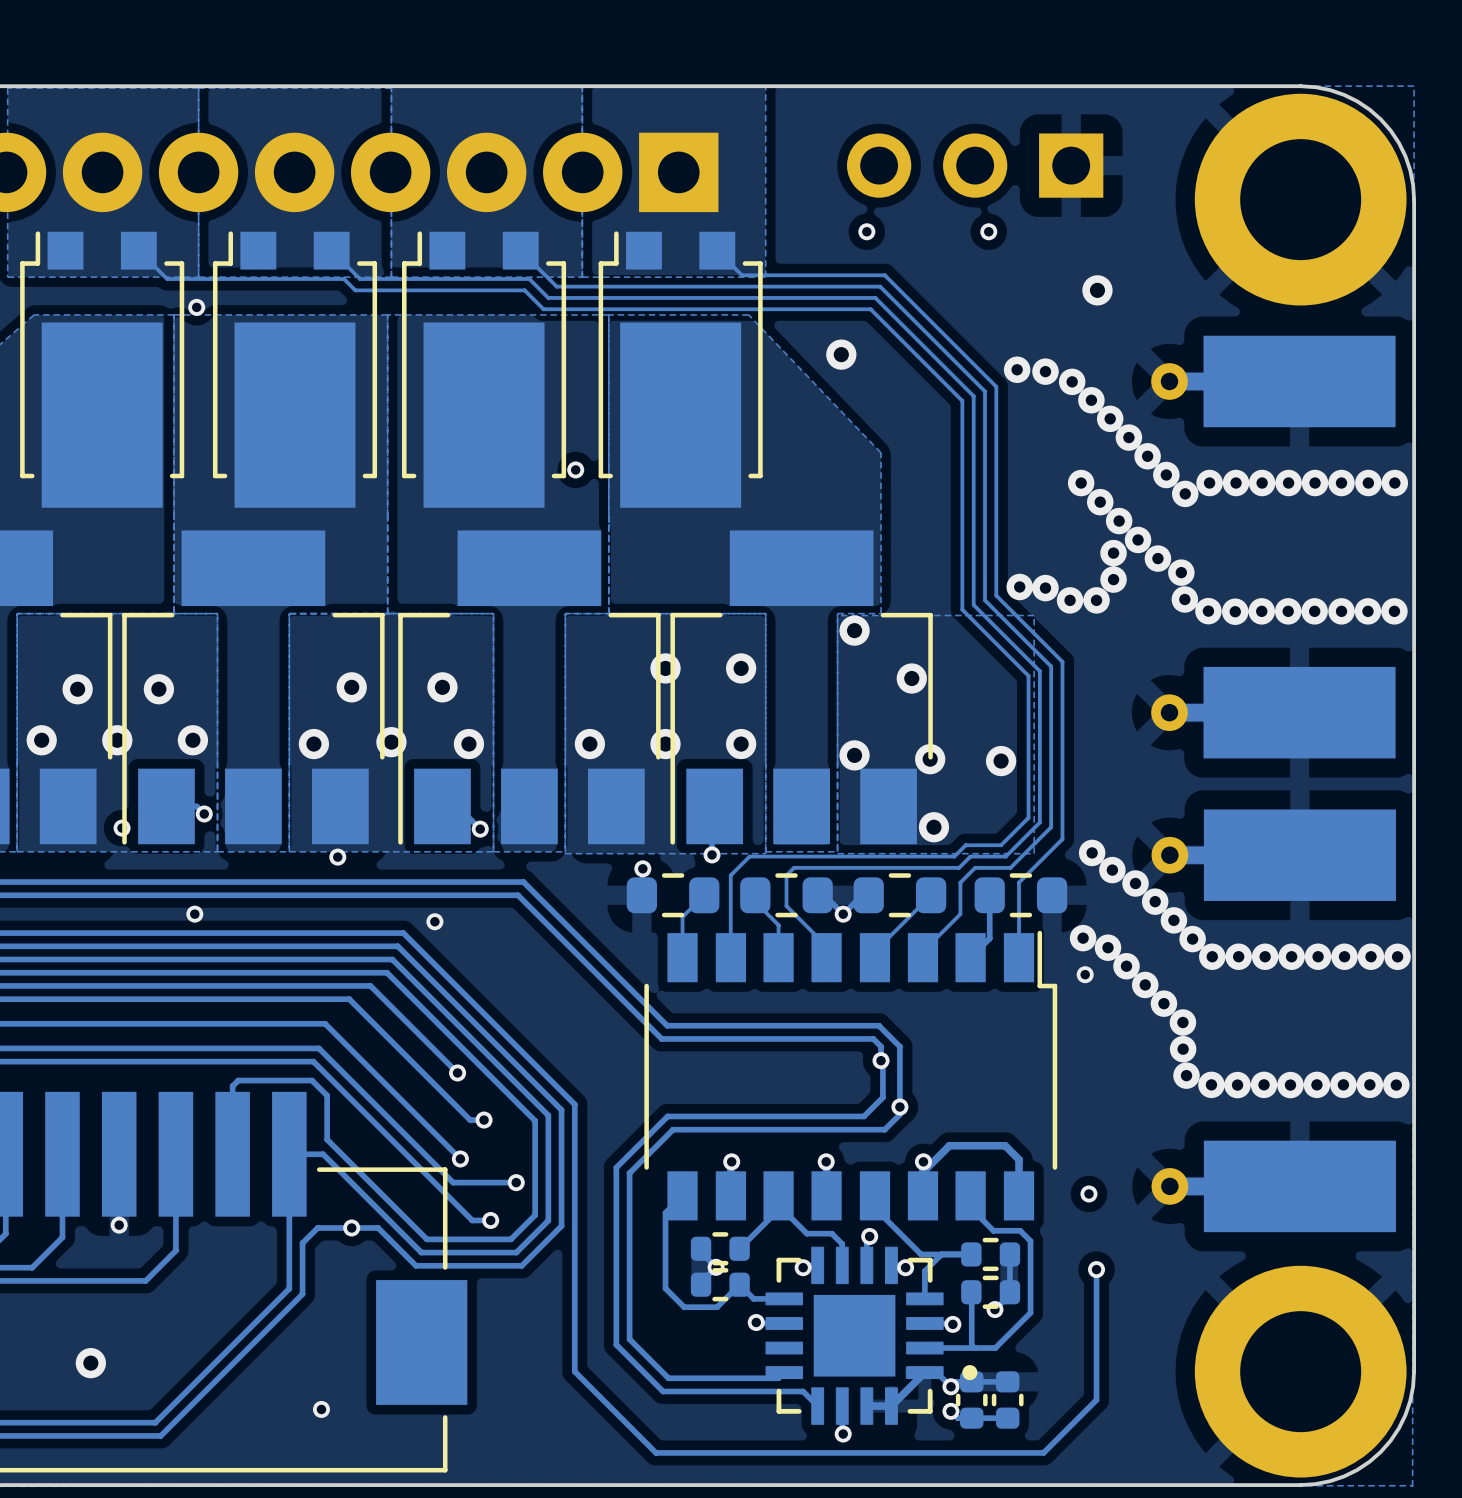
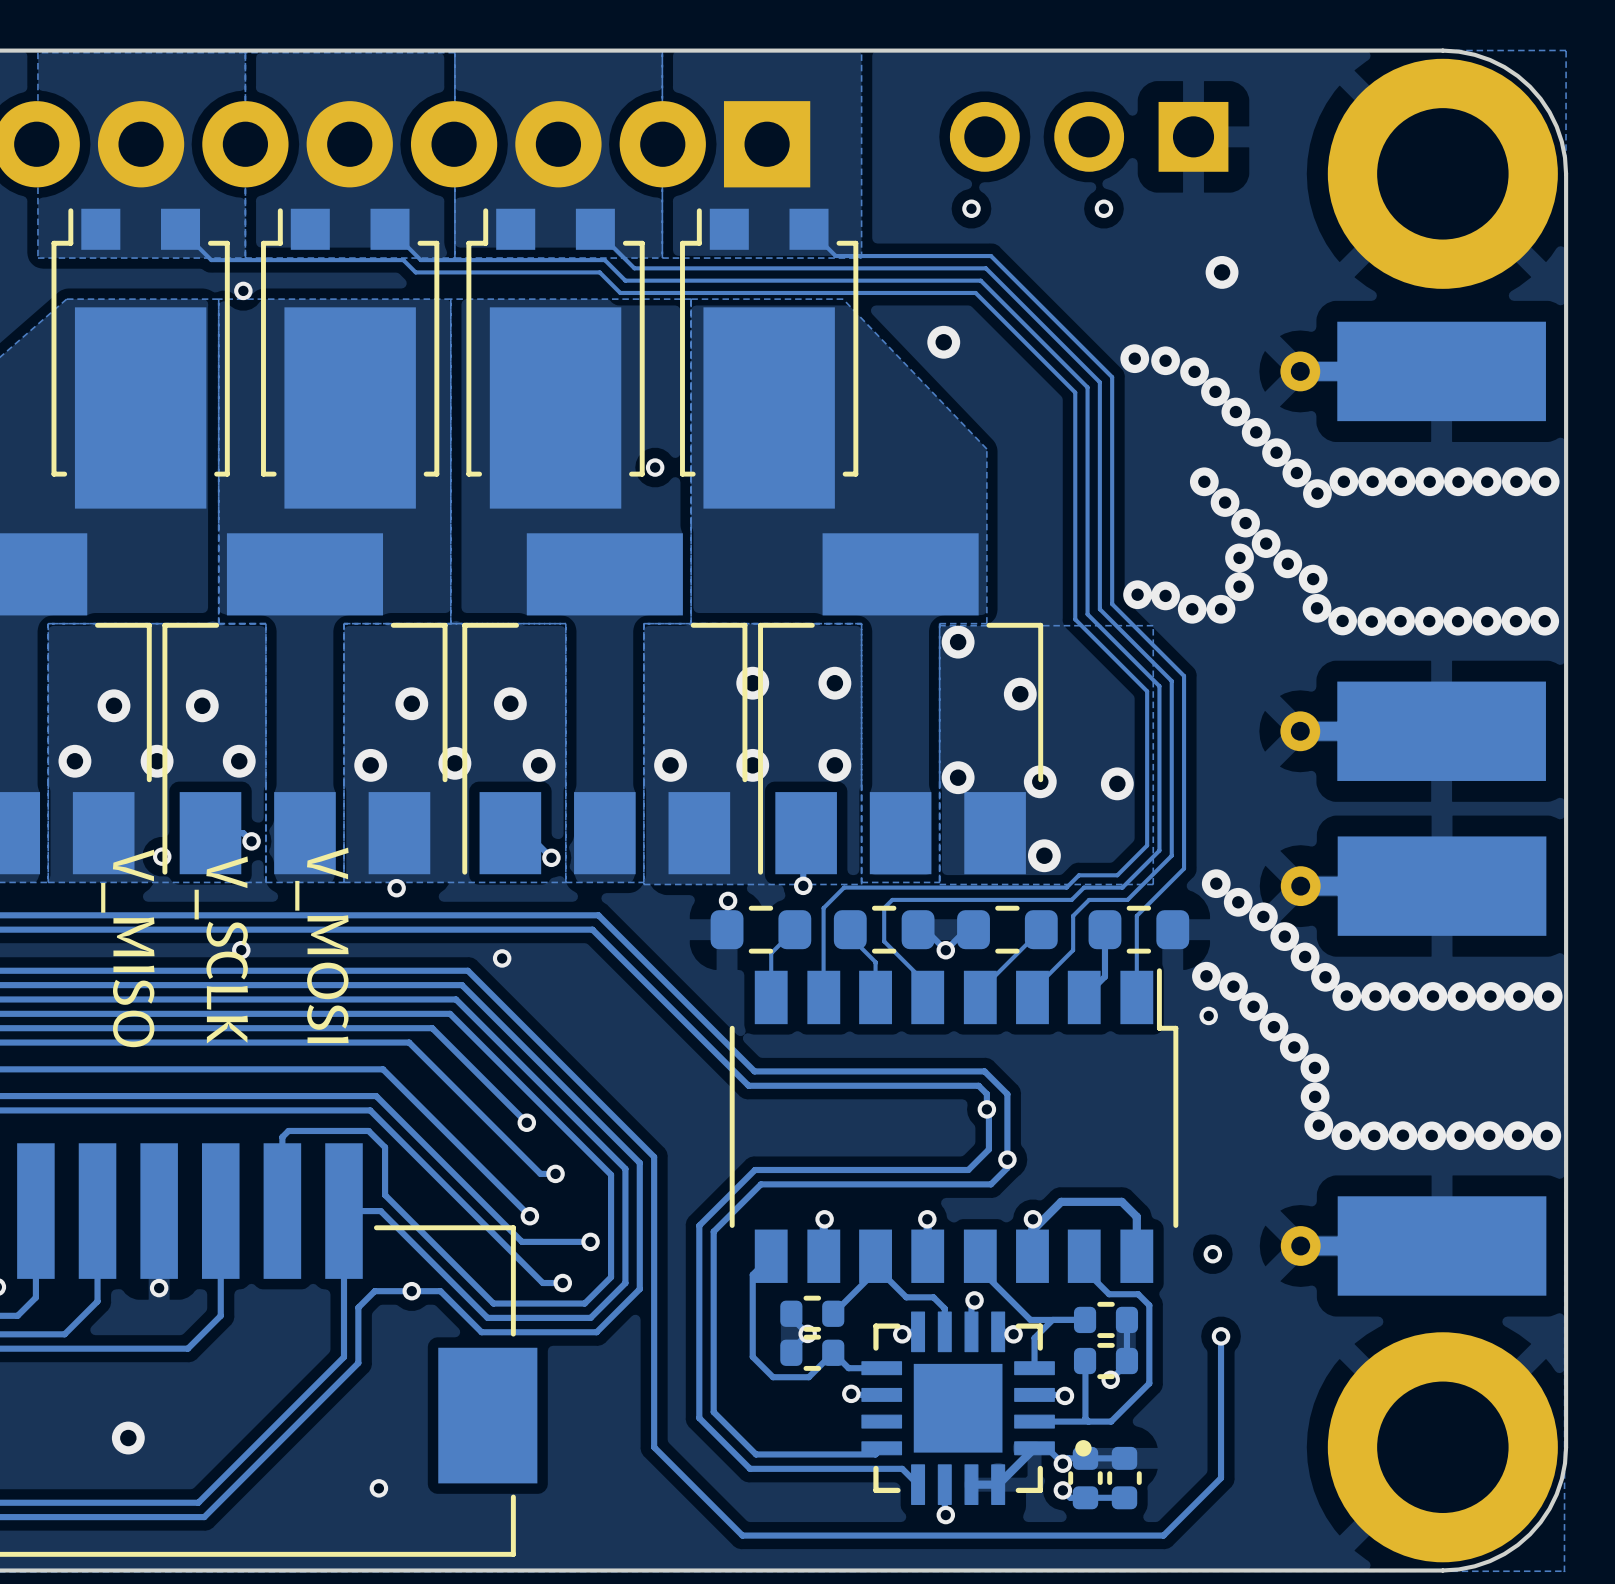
text: none -> V_MOSI (321, 945)
text: none -> V_MISO (127, 948)
text: none -> V_SCLK (221, 949)

